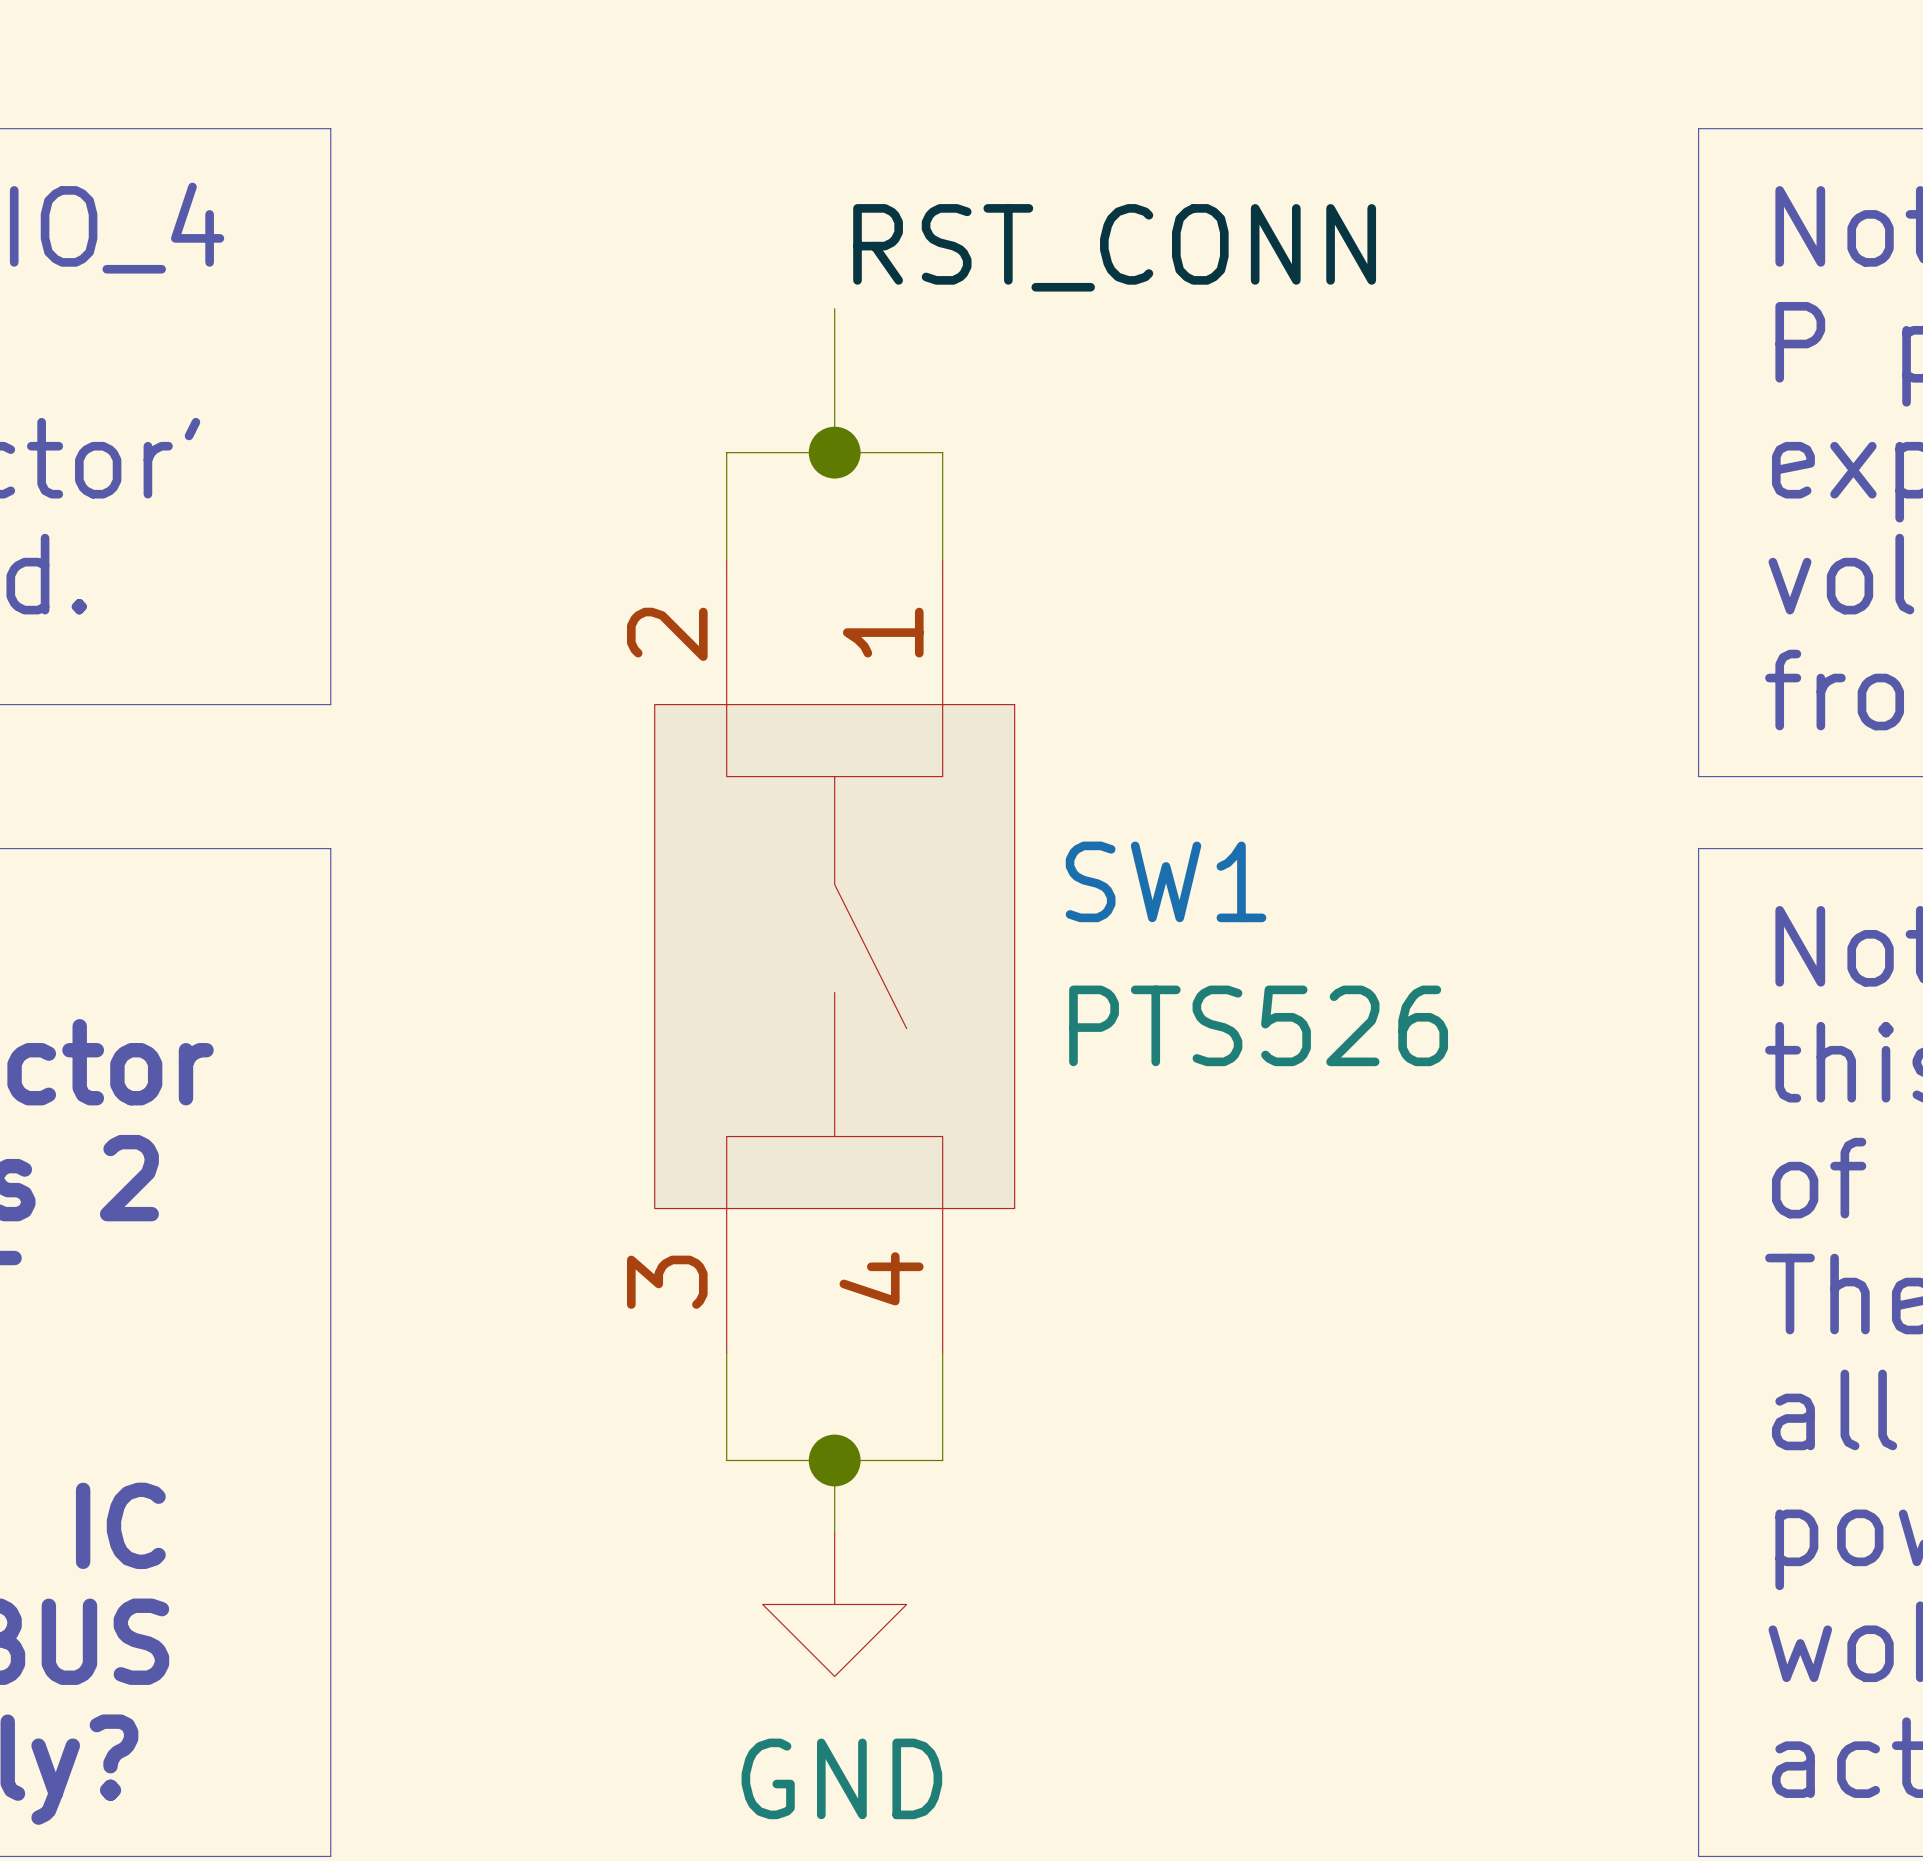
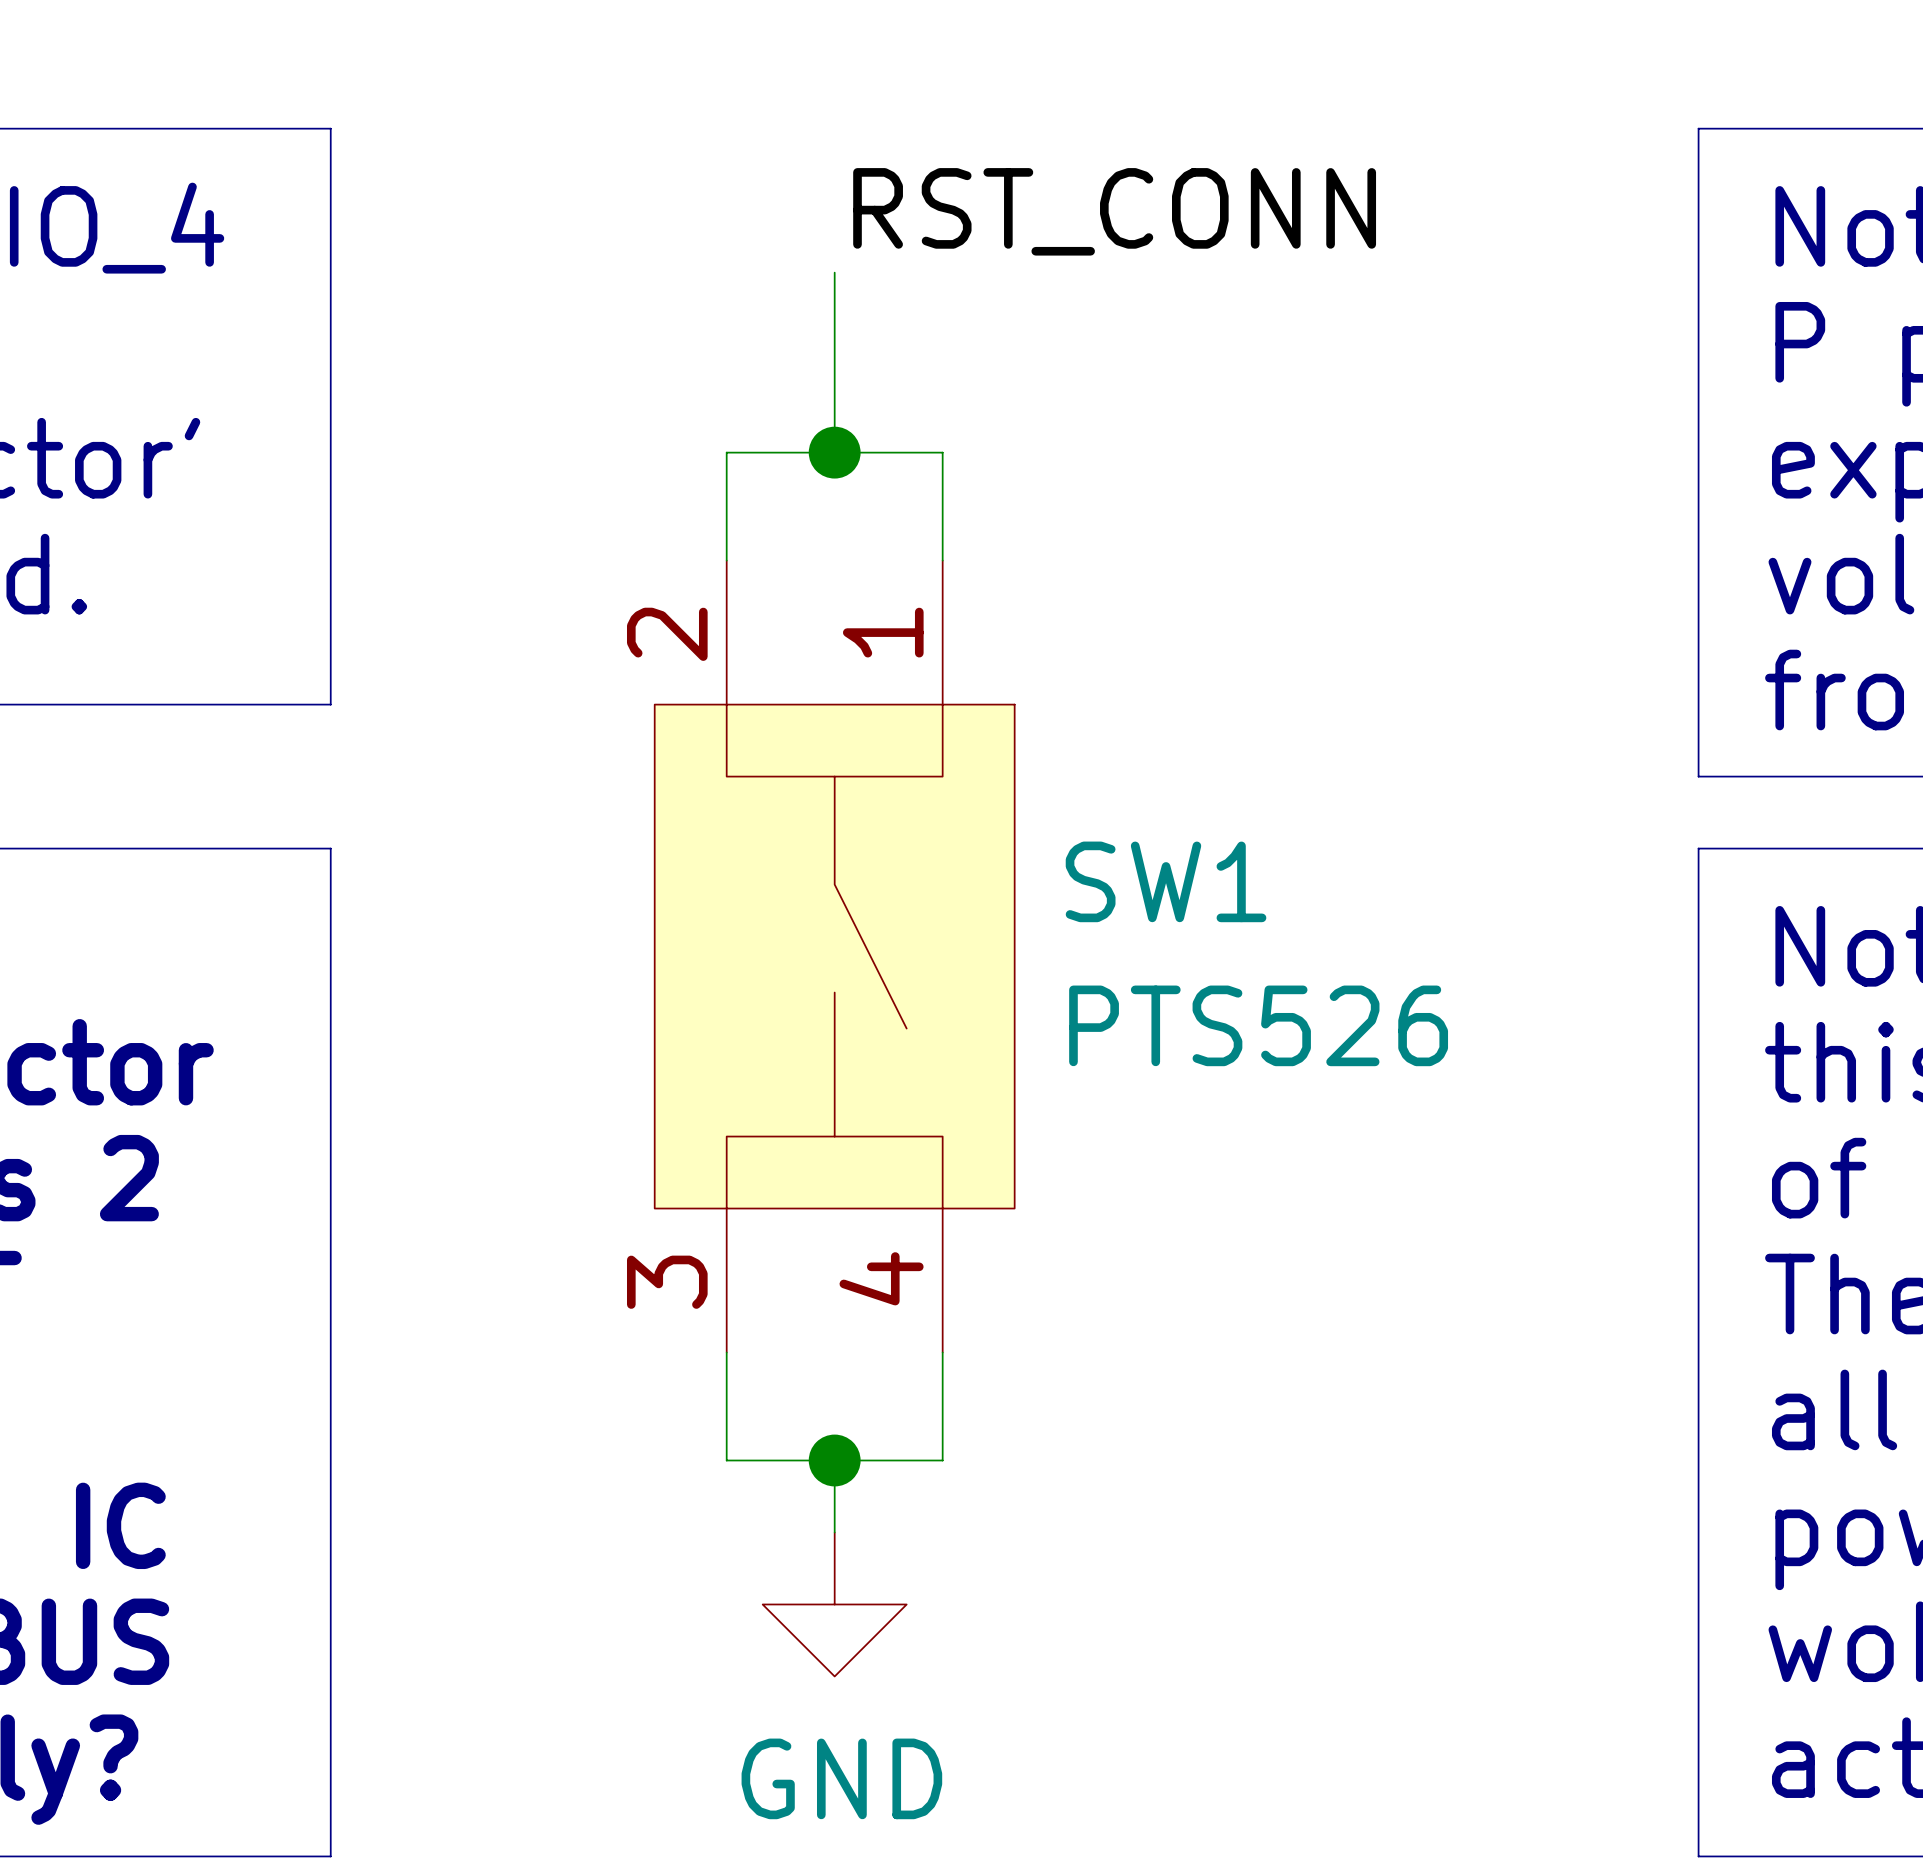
label position: RST_CONN (1114, 247) -> RST_CONN (1114, 211)
wire: none -> (834, 272) (834, 308)

